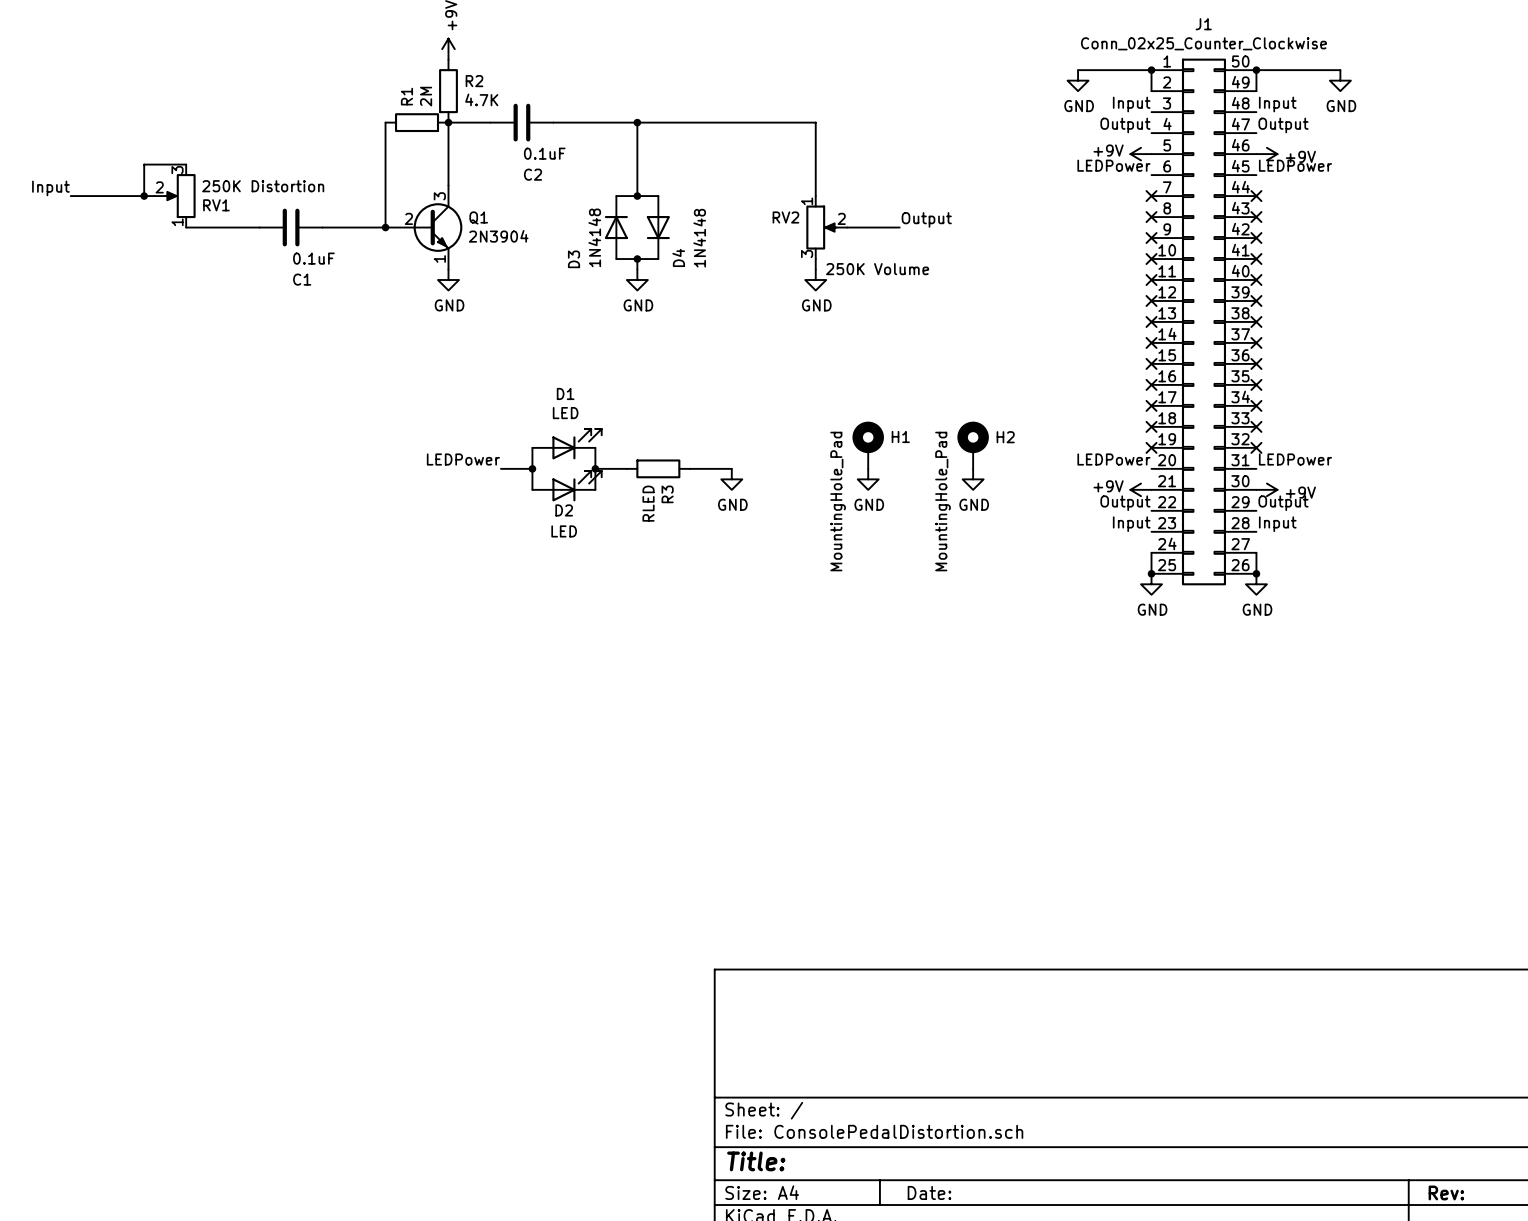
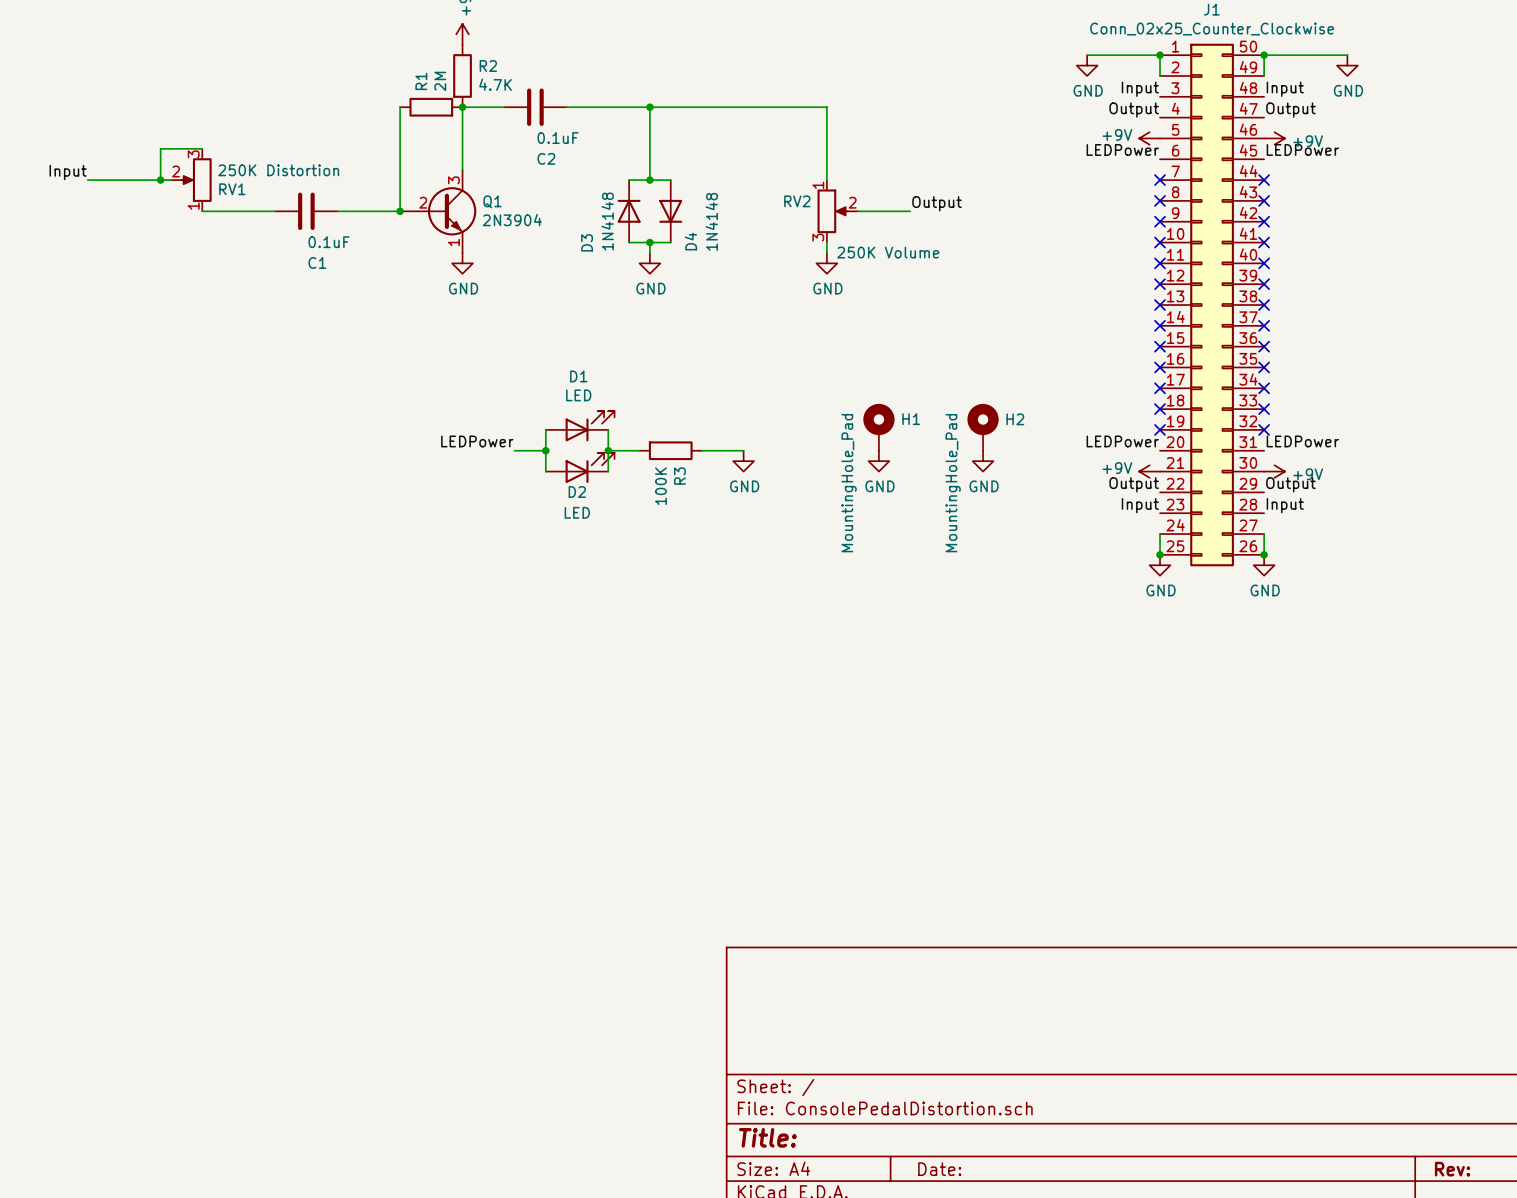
R3 value: RLED (648, 503) -> 100K (660, 486)

